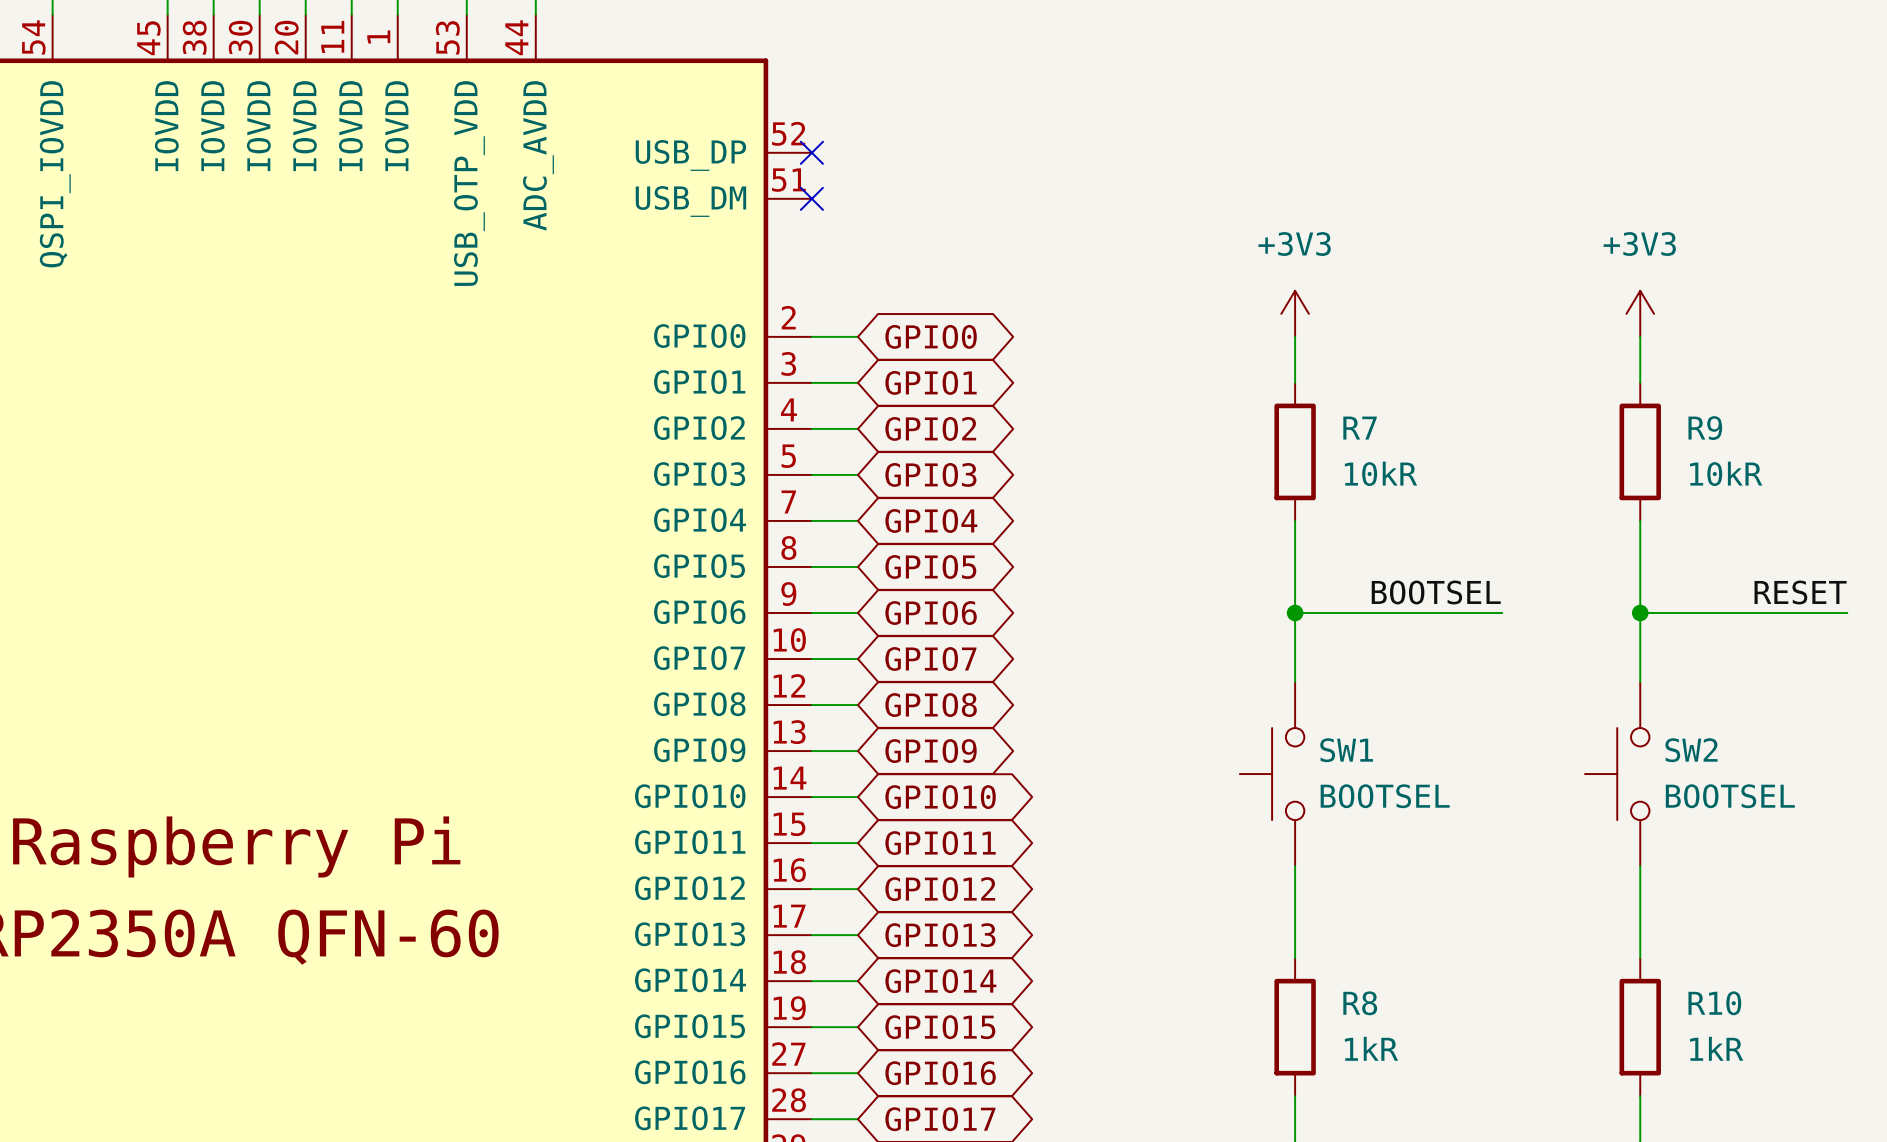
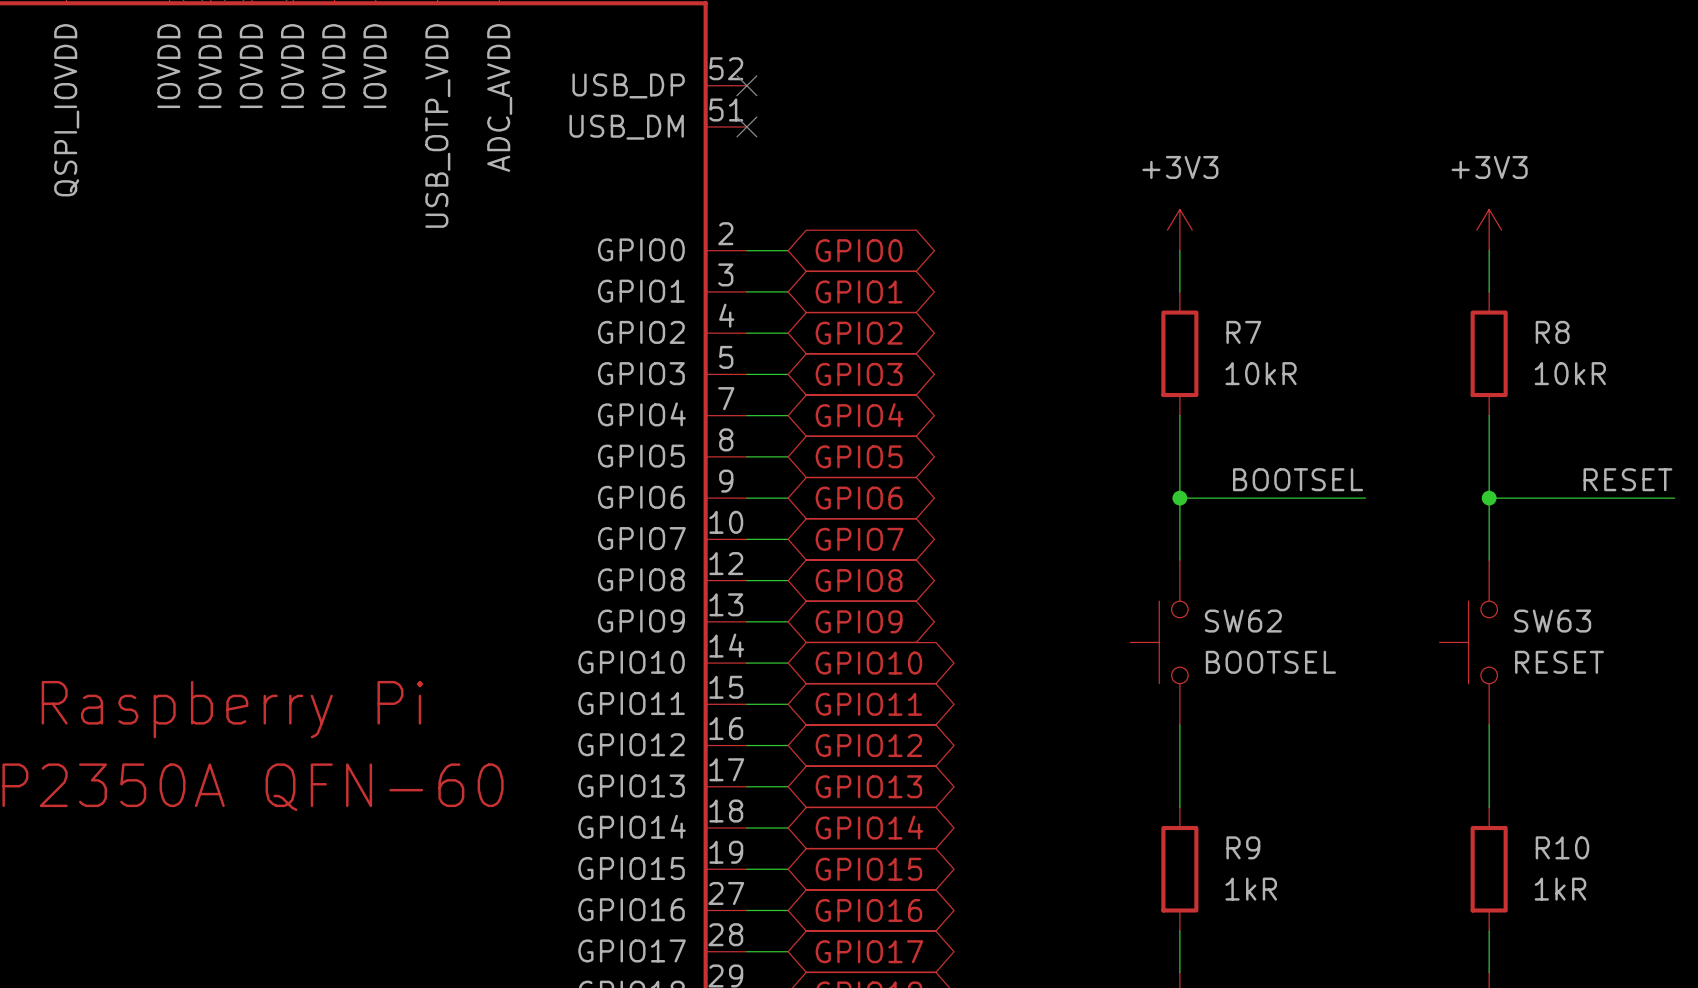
R9 name: R9 (1705, 428) -> R8 (1552, 332)
SW1 name: SW1 (1346, 750) -> SW62 (1243, 621)
SW2 name: SW2 (1691, 750) -> SW63 (1552, 621)
SW2 value: BOOTSEL (1730, 796) -> RESET (1559, 662)
R8 name: R8 (1360, 1003) -> R9 (1243, 847)

